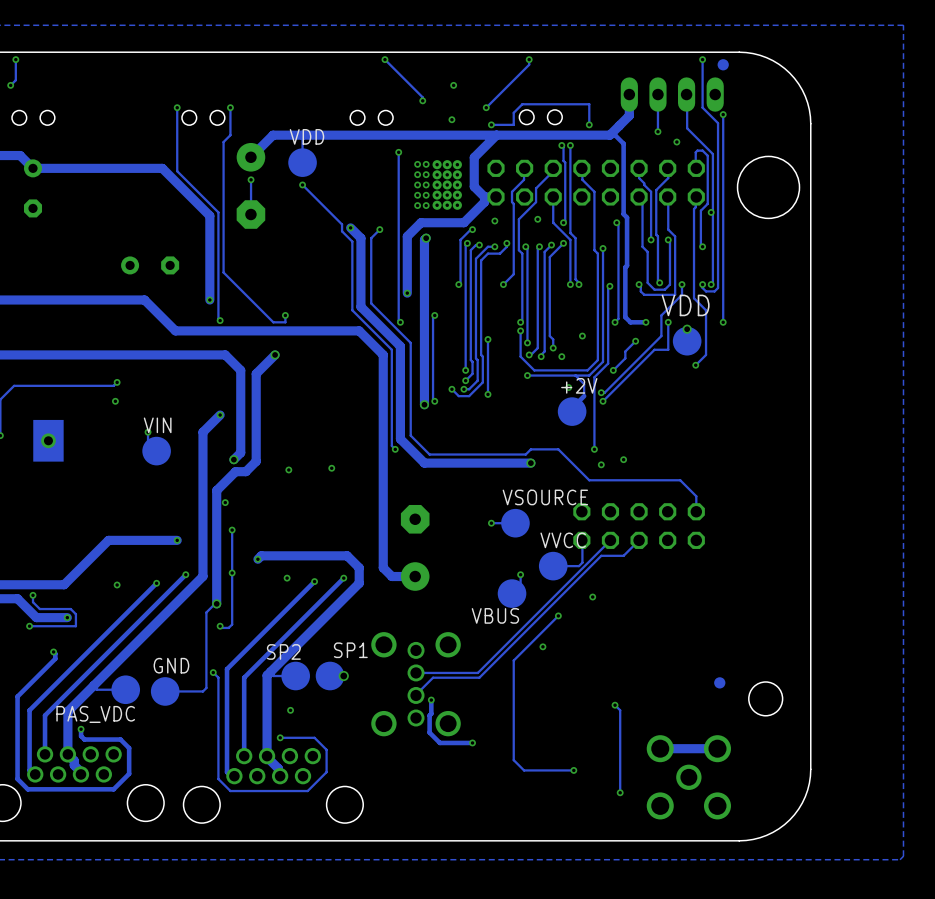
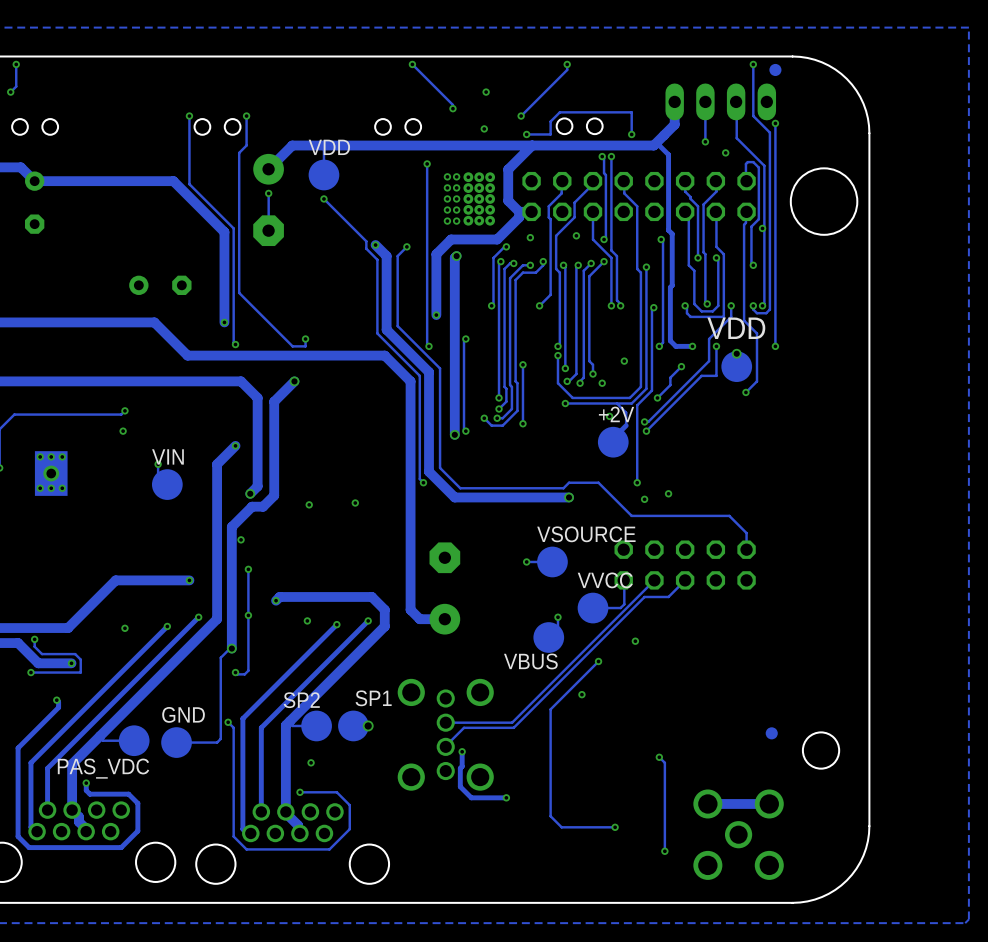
via: none -> (40, 456)
via: none -> (51, 456)
via: none -> (62, 456)
via: none -> (40, 488)
via: none -> (51, 488)
via: none -> (62, 488)

